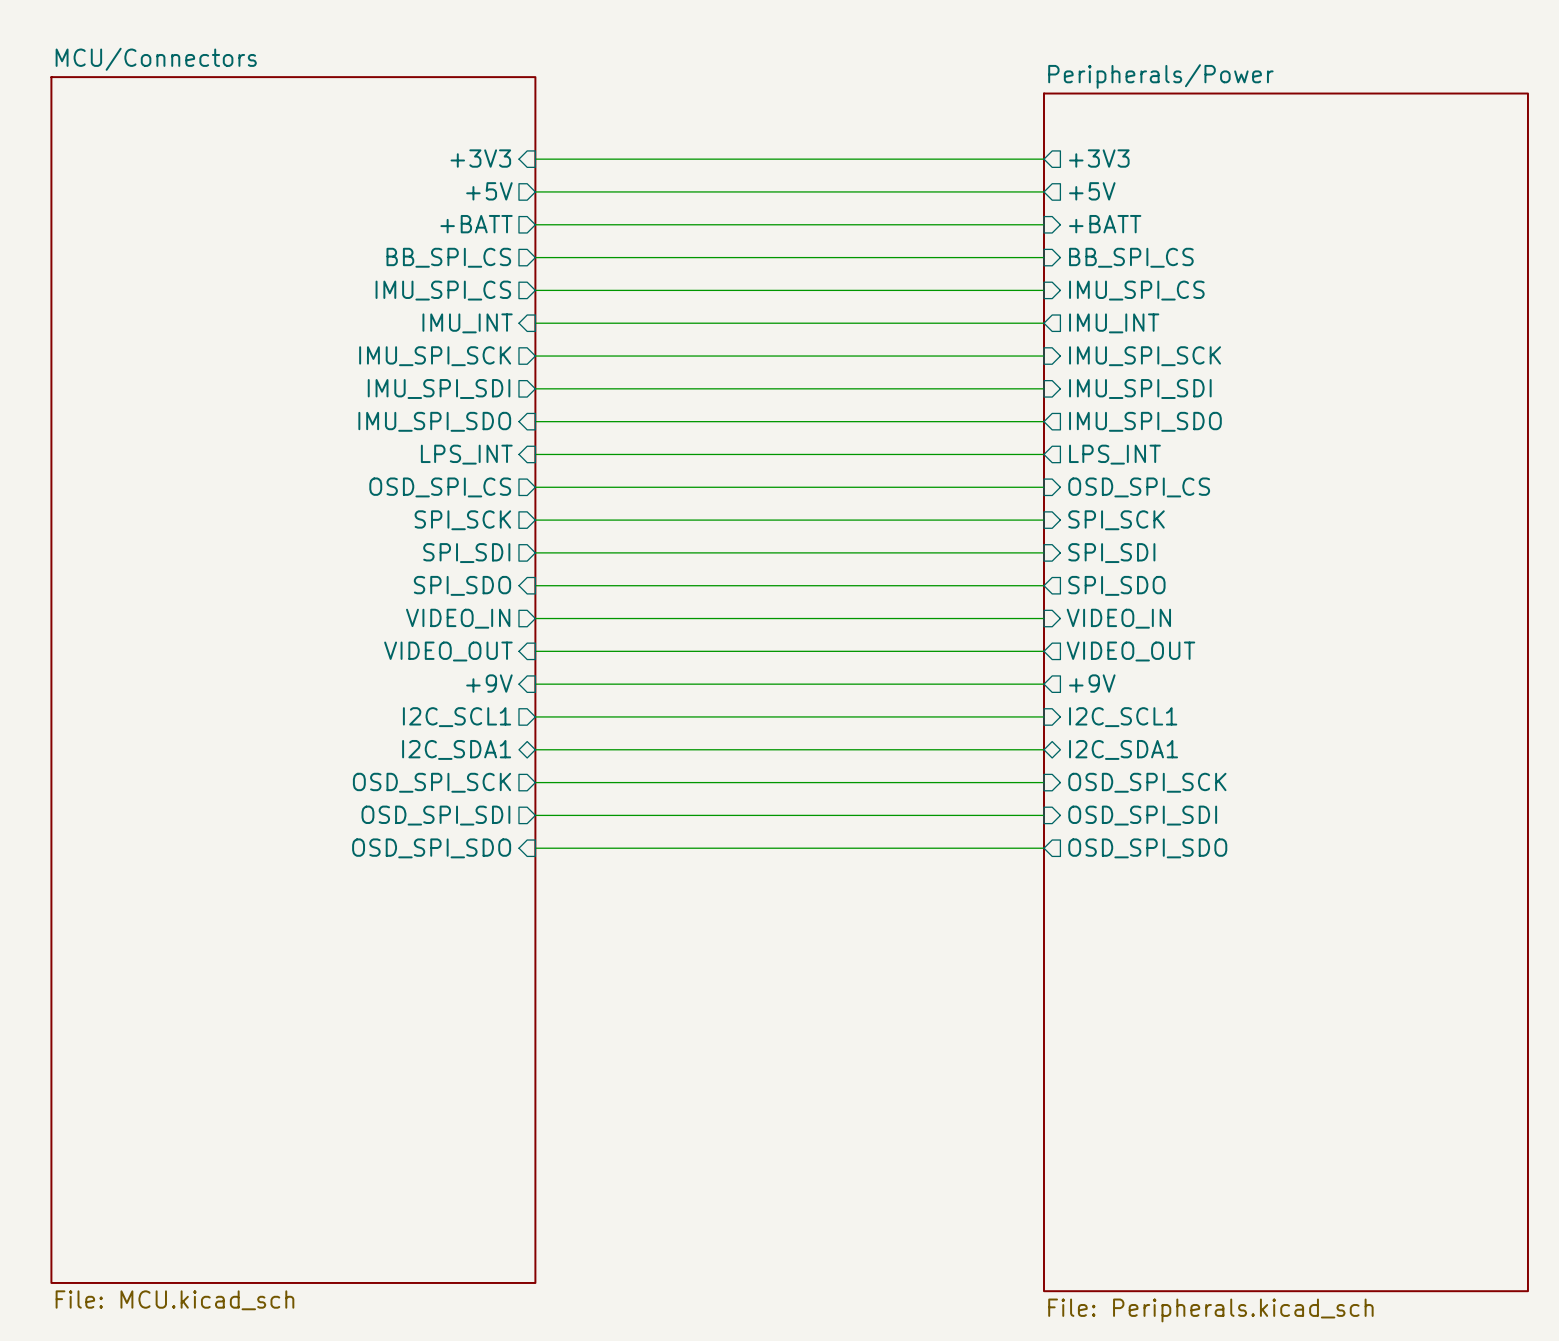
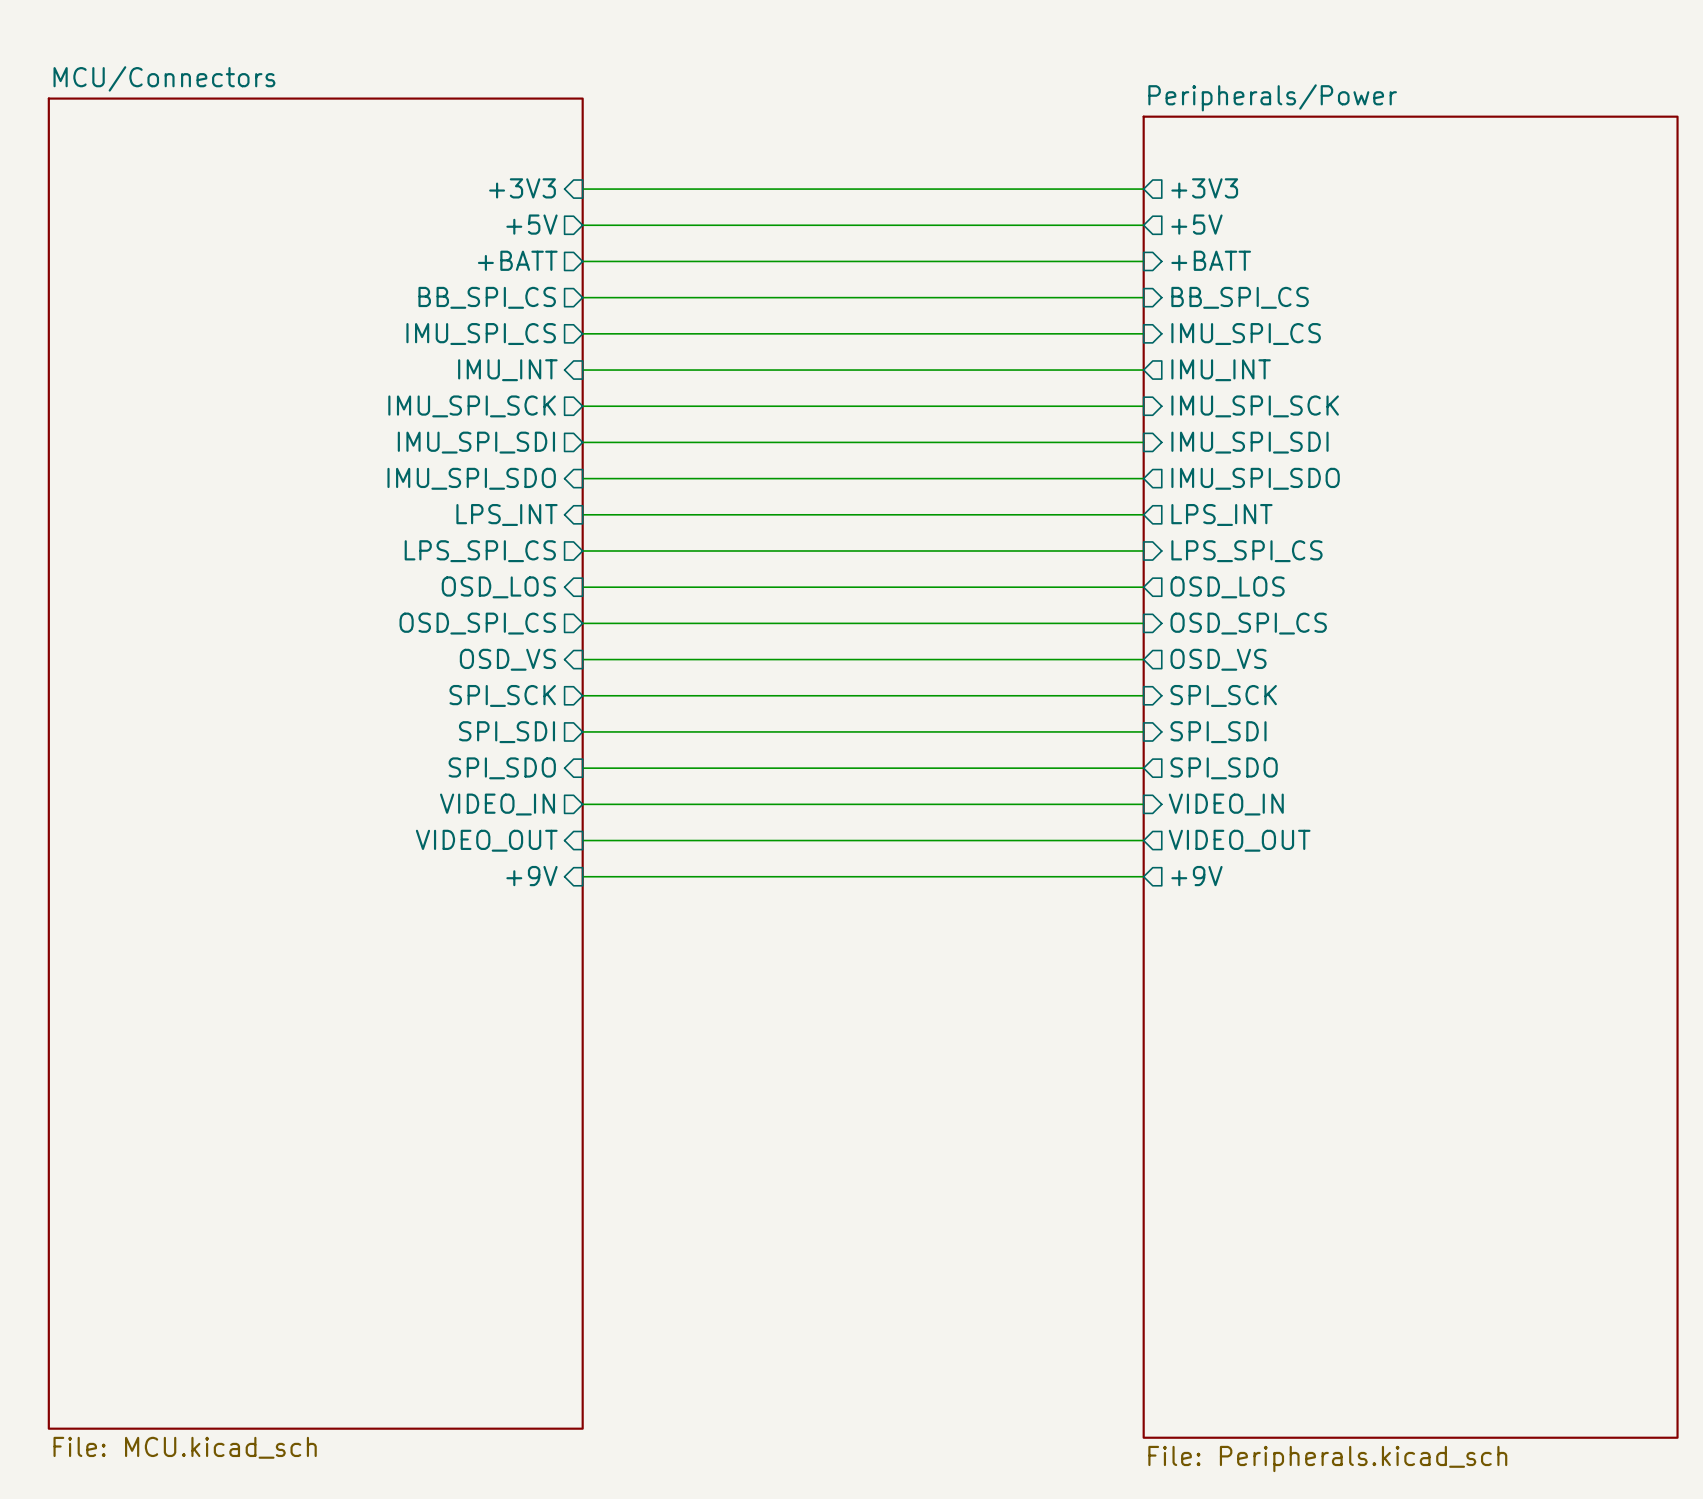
sheet pin: OSD_SPI_CS (440, 487) -> LPS_SPI_CS (480, 551)
sheet pin: OSD_SPI_CS (1139, 487) -> LPS_SPI_CS (1246, 551)
sheet pin shape: output (462, 520) -> input (498, 587)
sheet pin: SPI_SCK (462, 520) -> OSD_LOS (498, 587)
sheet pin shape: input (1116, 520) -> output (1227, 587)
sheet pin: SPI_SCK (1116, 520) -> OSD_LOS (1227, 587)
sheet pin: SPI_SDI (466, 553) -> OSD_SPI_CS (477, 623)
sheet pin: SPI_SDI (1111, 553) -> OSD_SPI_CS (1248, 623)
sheet pin: SPI_SDO (462, 585) -> OSD_VS (507, 659)
sheet pin: SPI_SDO (1116, 585) -> OSD_VS (1218, 659)
sheet pin: VIDEO_IN (458, 618) -> SPI_SCK (502, 695)
sheet pin: VIDEO_IN (1118, 618) -> SPI_SCK (1223, 695)
sheet pin shape: input (448, 651) -> output (507, 732)
sheet pin: VIDEO_OUT (448, 651) -> SPI_SDI (507, 732)
sheet pin shape: output (1130, 651) -> input (1218, 732)
sheet pin: VIDEO_OUT (1130, 651) -> SPI_SDI (1218, 732)
sheet pin: +9V (489, 683) -> SPI_SDO (502, 768)
sheet pin: +9V (1092, 683) -> SPI_SDO (1224, 768)
sheet pin: I2C_SCL1 (457, 717) -> VIDEO_IN (497, 804)
sheet pin: I2C_SCL1 (1123, 717) -> VIDEO_IN (1226, 804)
sheet pin shape: bidirectional (456, 749) -> input (486, 840)
sheet pin: I2C_SDA1 (456, 749) -> VIDEO_OUT (486, 840)
sheet pin shape: bidirectional (1123, 749) -> output (1239, 840)
sheet pin: I2C_SDA1 (1123, 749) -> VIDEO_OUT (1239, 840)
sheet pin shape: output (432, 782) -> input (531, 876)
sheet pin: OSD_SPI_SCK (432, 782) -> +9V (531, 876)
sheet pin shape: input (1147, 782) -> output (1196, 876)
sheet pin: OSD_SPI_SCK (1147, 782) -> +9V (1196, 876)
sheet pin: OSD_SPI_SDI (435, 815) -> none
wire: (535, 815) (1043, 815) -> none
sheet pin: OSD_SPI_SDI (1142, 815) -> none
sheet pin: OSD_SPI_SDO (431, 848) -> none
wire: (535, 848) (1043, 848) -> none
sheet pin: OSD_SPI_SDO (1147, 848) -> none

